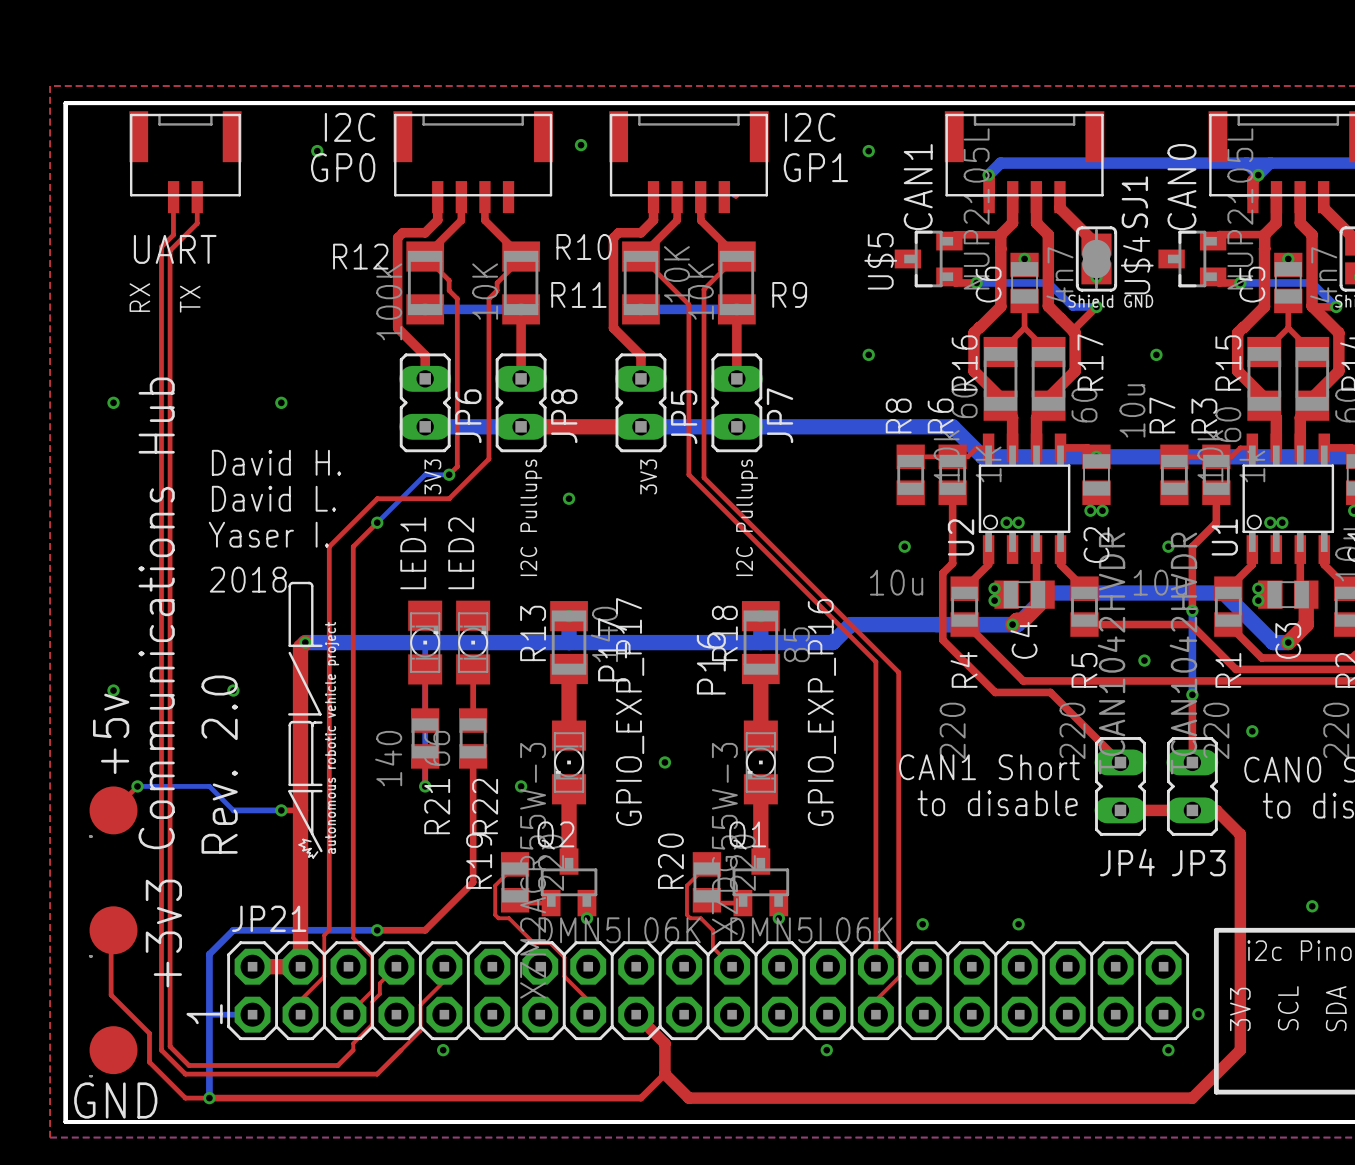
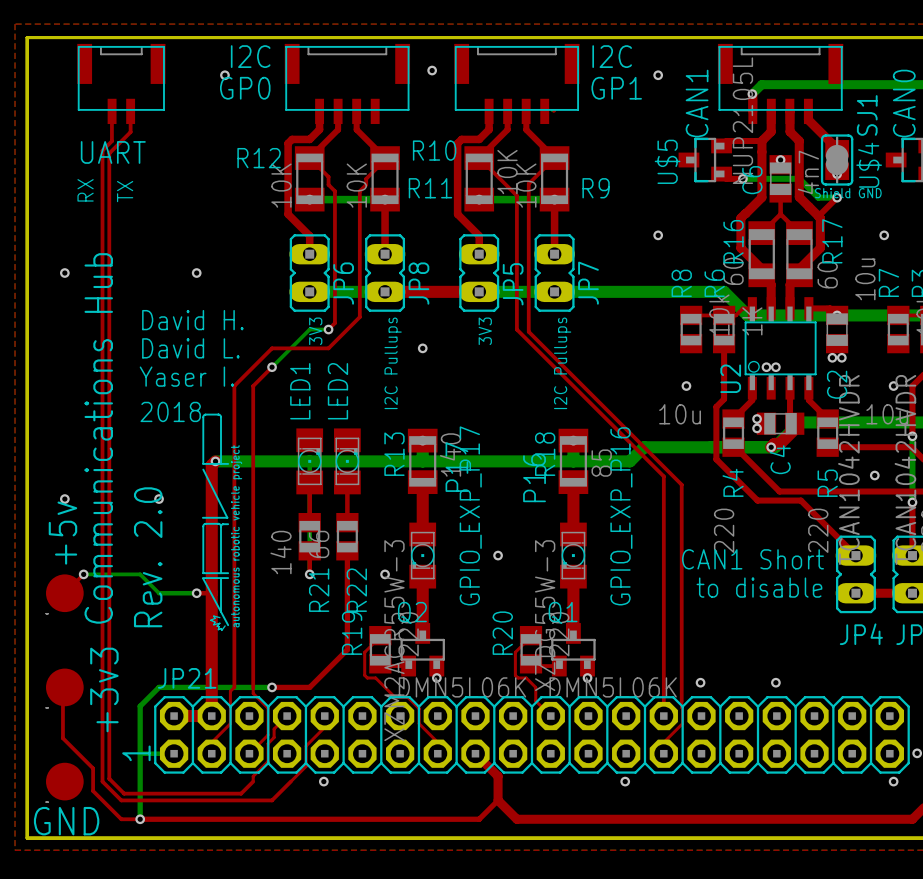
R12 value: 100K (389, 301) -> 10K (281, 185)

